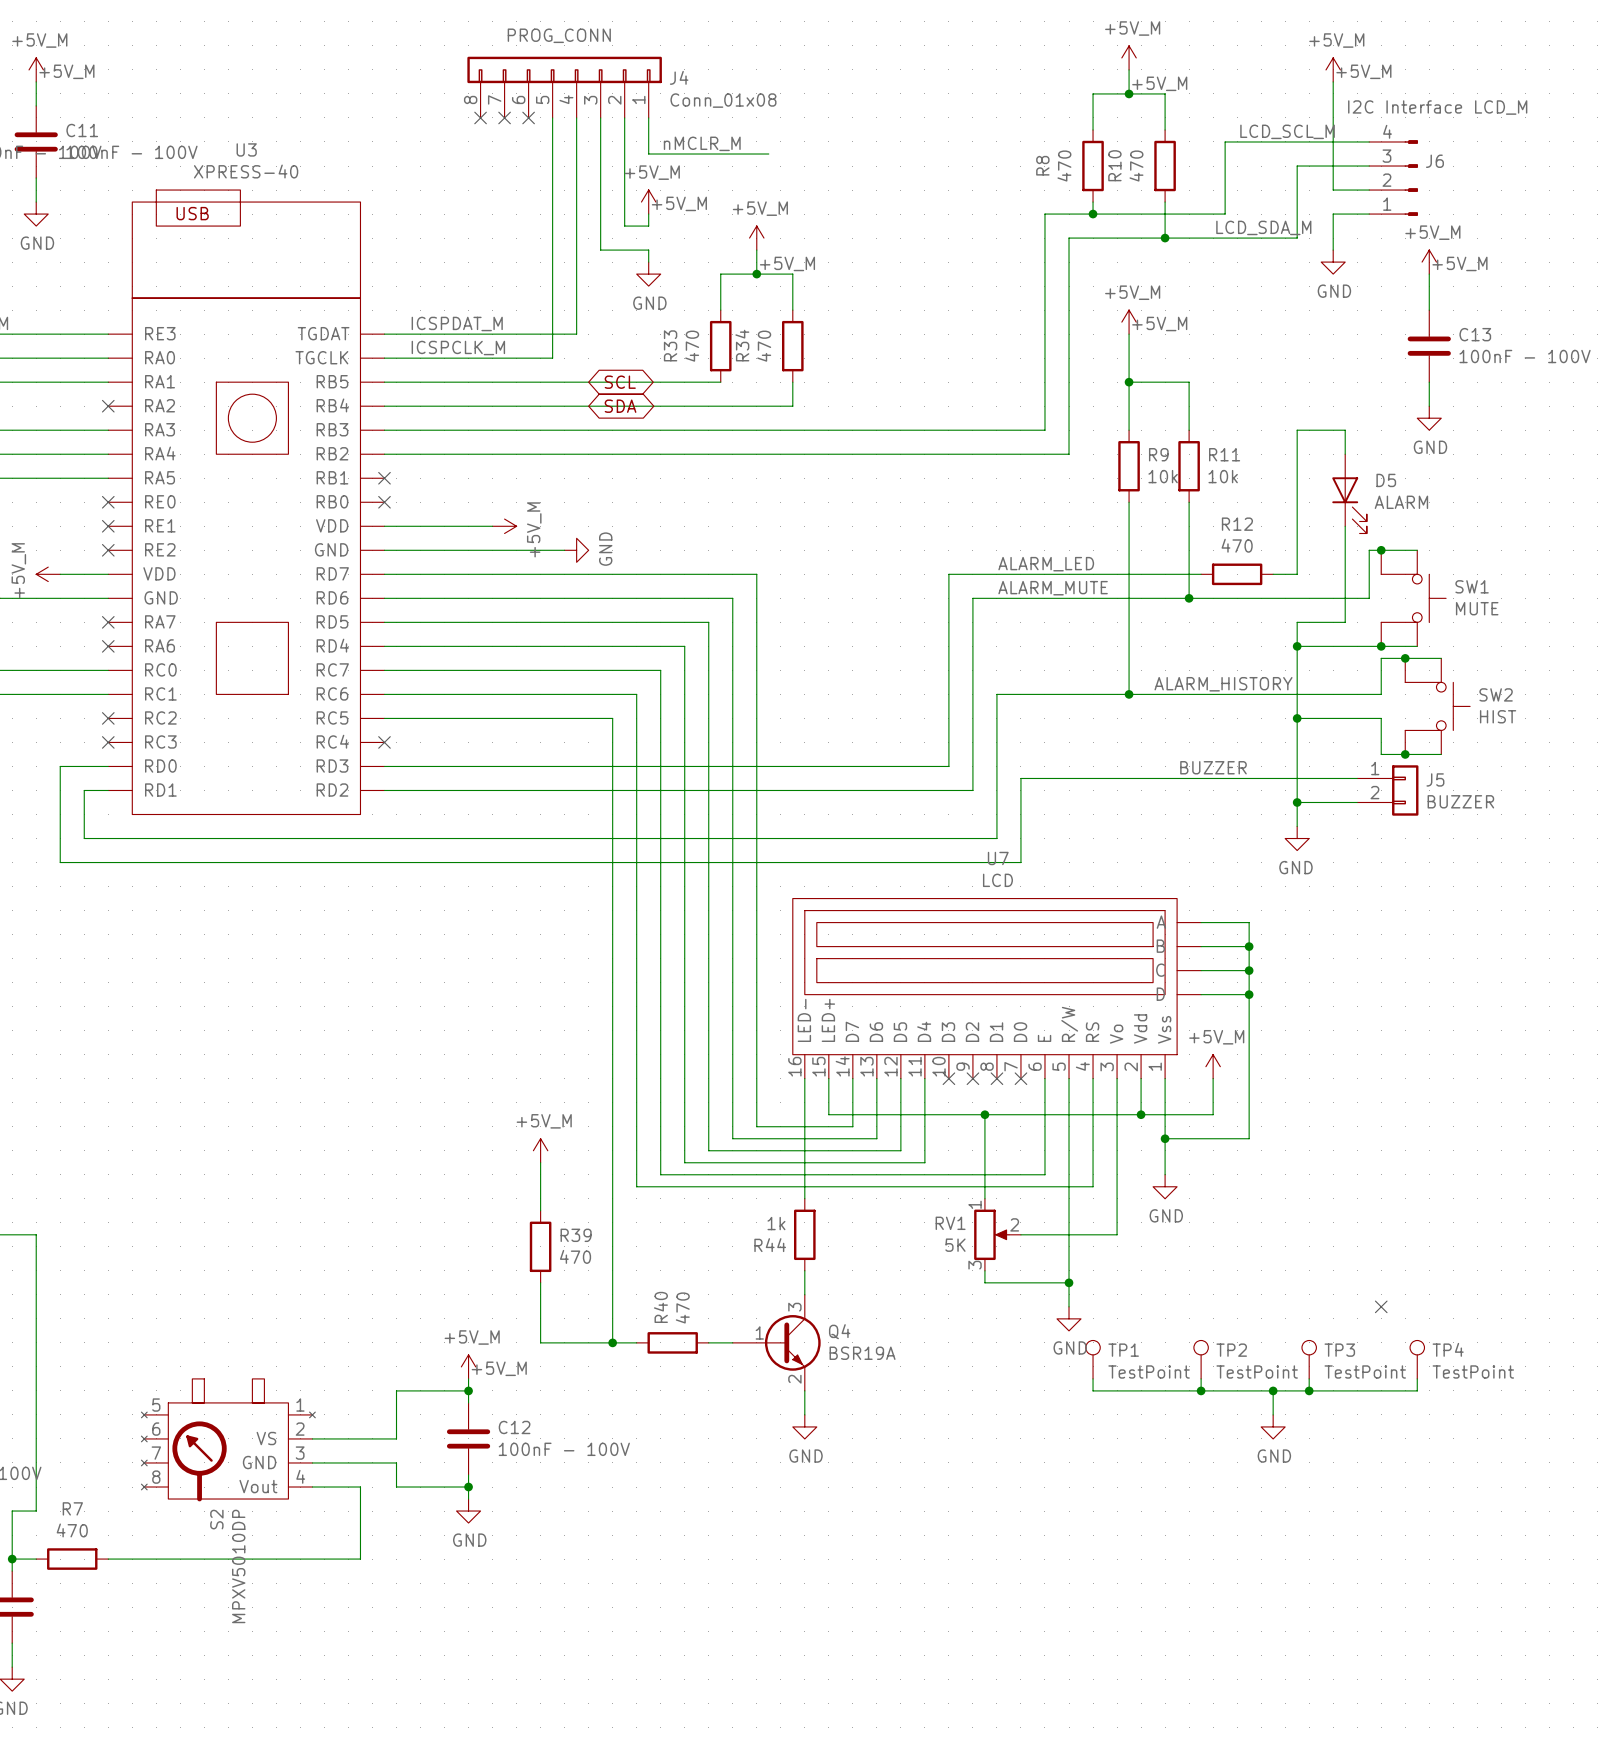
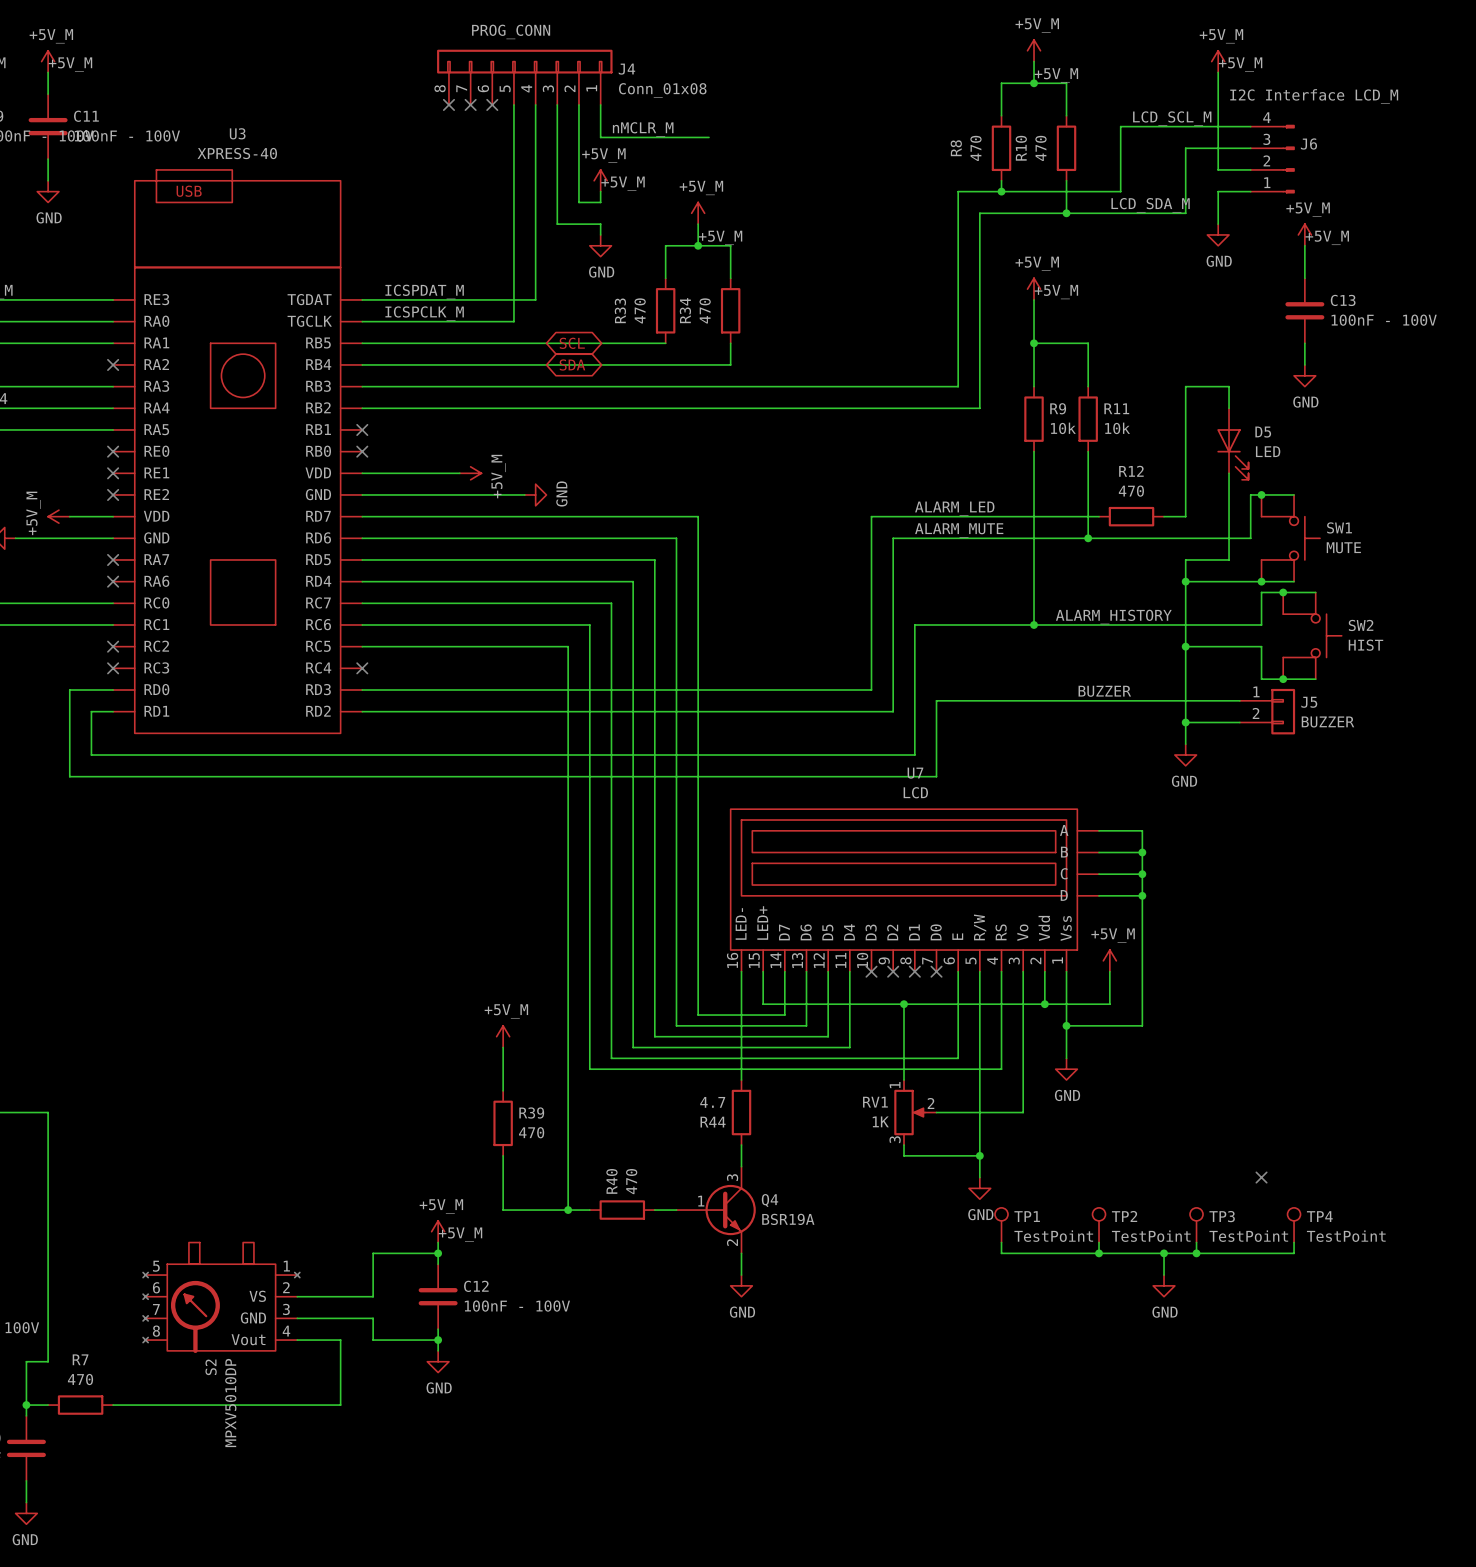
D5 value: ALARM (1401, 502) -> LED (1268, 451)
R44 value: 1k (776, 1223) -> 4.7 (712, 1102)
RV1 value: 5K (955, 1245) -> 1K (880, 1121)

